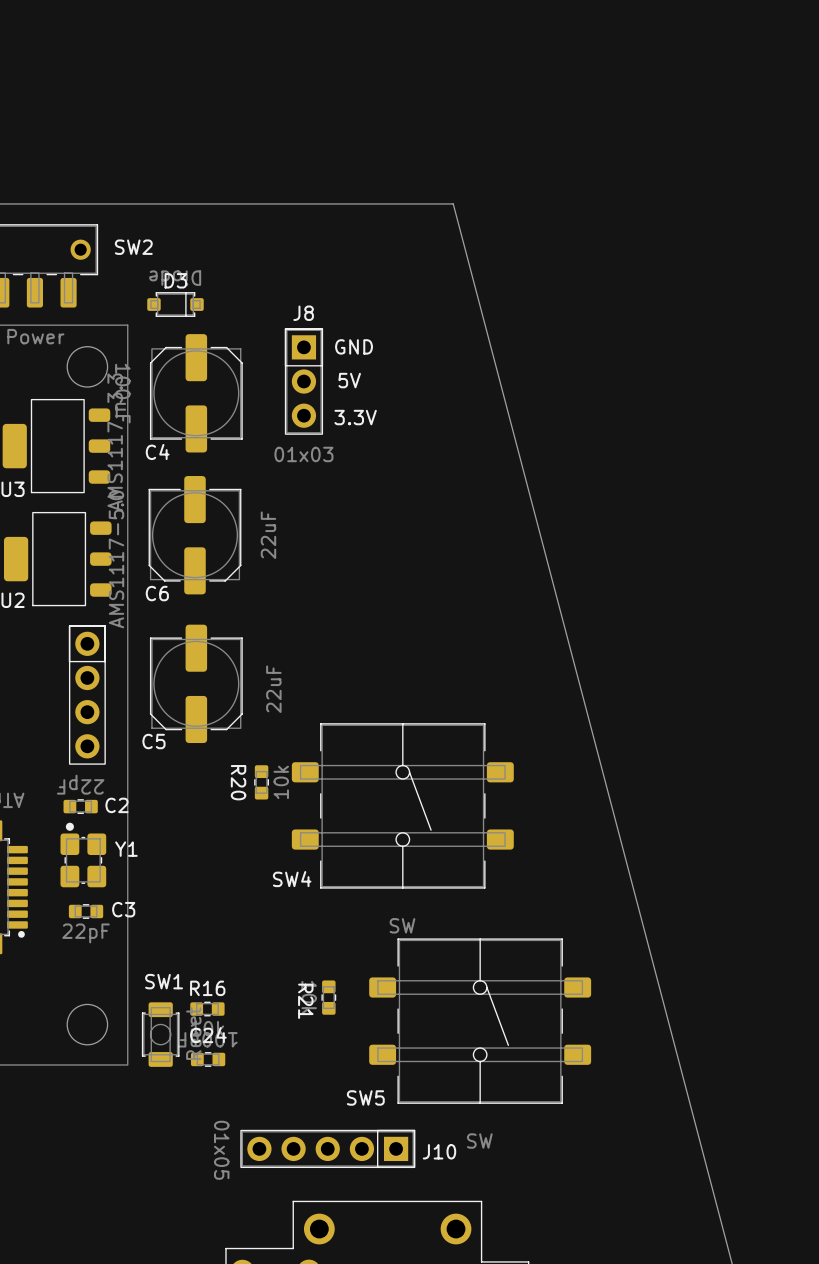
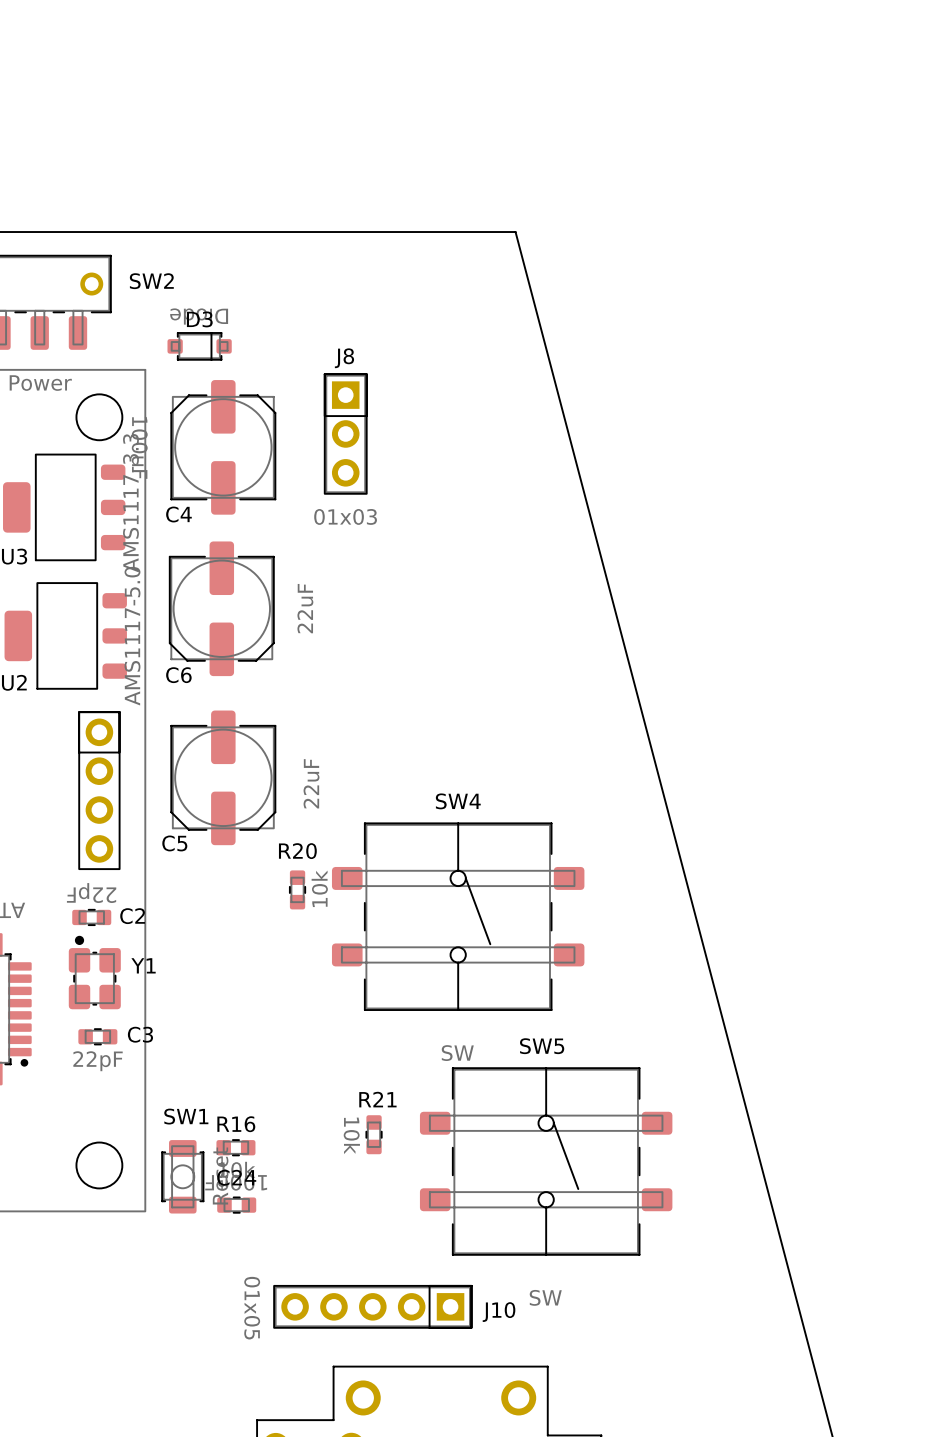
text: GND (354, 346) -> none
text: 5V (349, 380) -> none
text: 3.3V (355, 417) -> none
R20 name rotation: 0° (238, 782) -> 90° counterclockwise (297, 851)
SW4 name position: SW4 (292, 879) -> SW4 (458, 801)
R21 name rotation: 0° (305, 1001) -> 90° counterclockwise (377, 1099)
SW5 name position: SW5 (365, 1097) -> SW5 (542, 1046)

